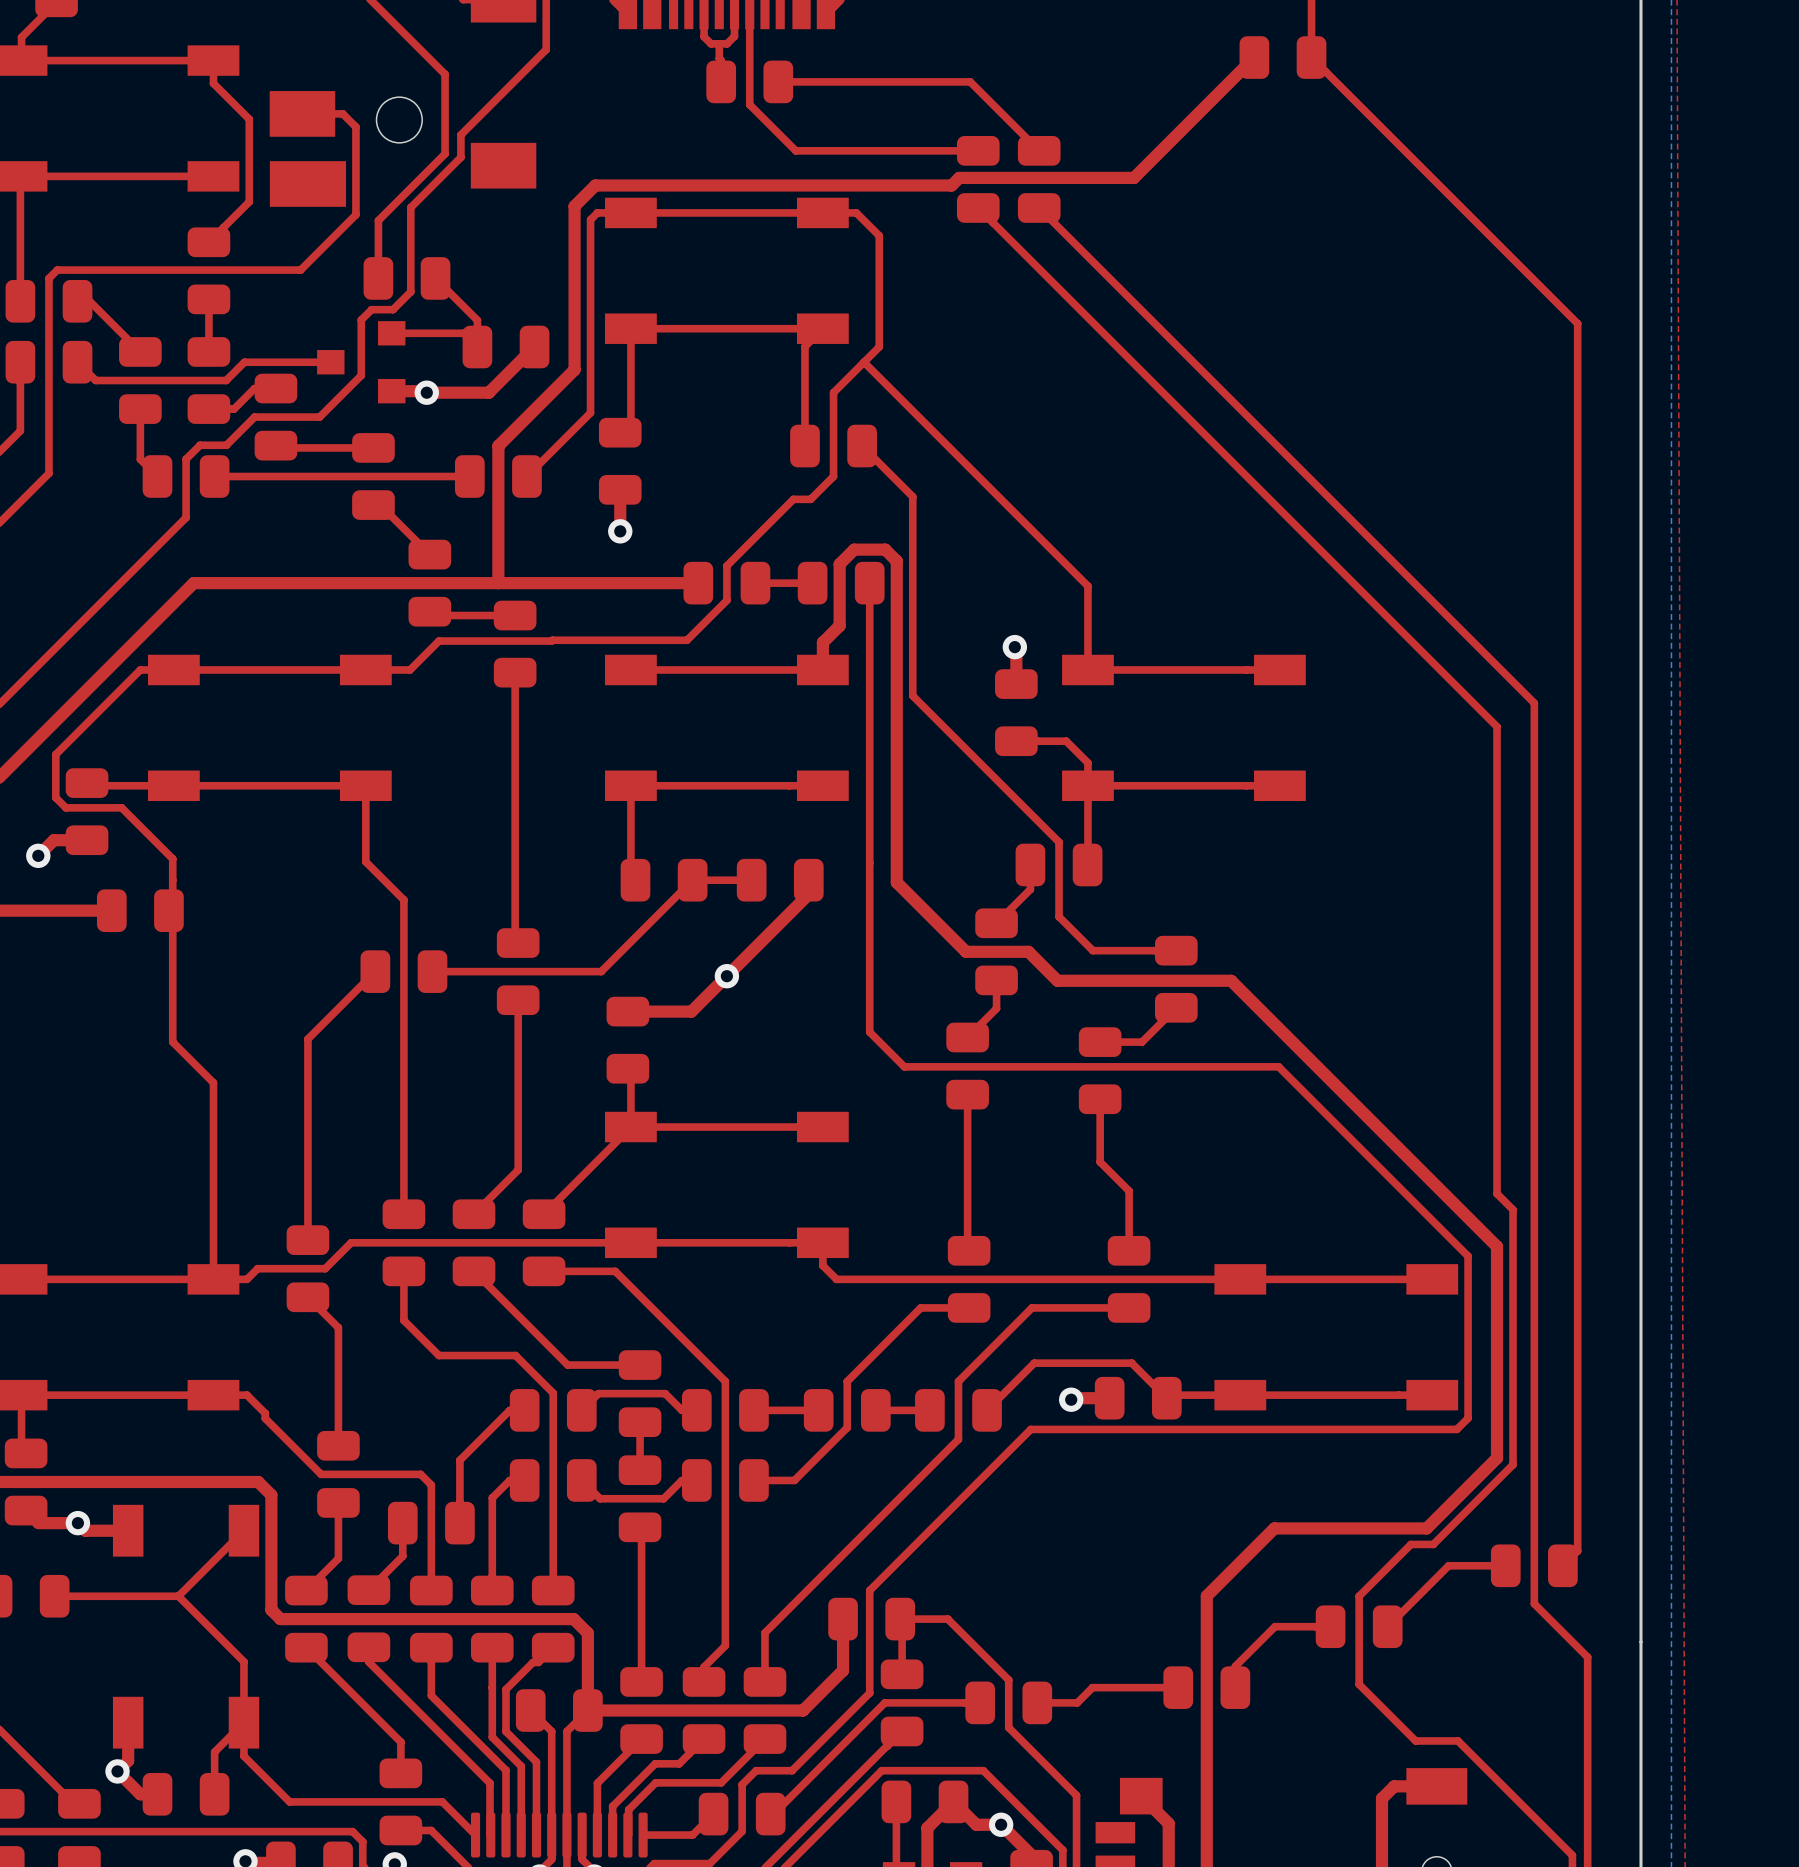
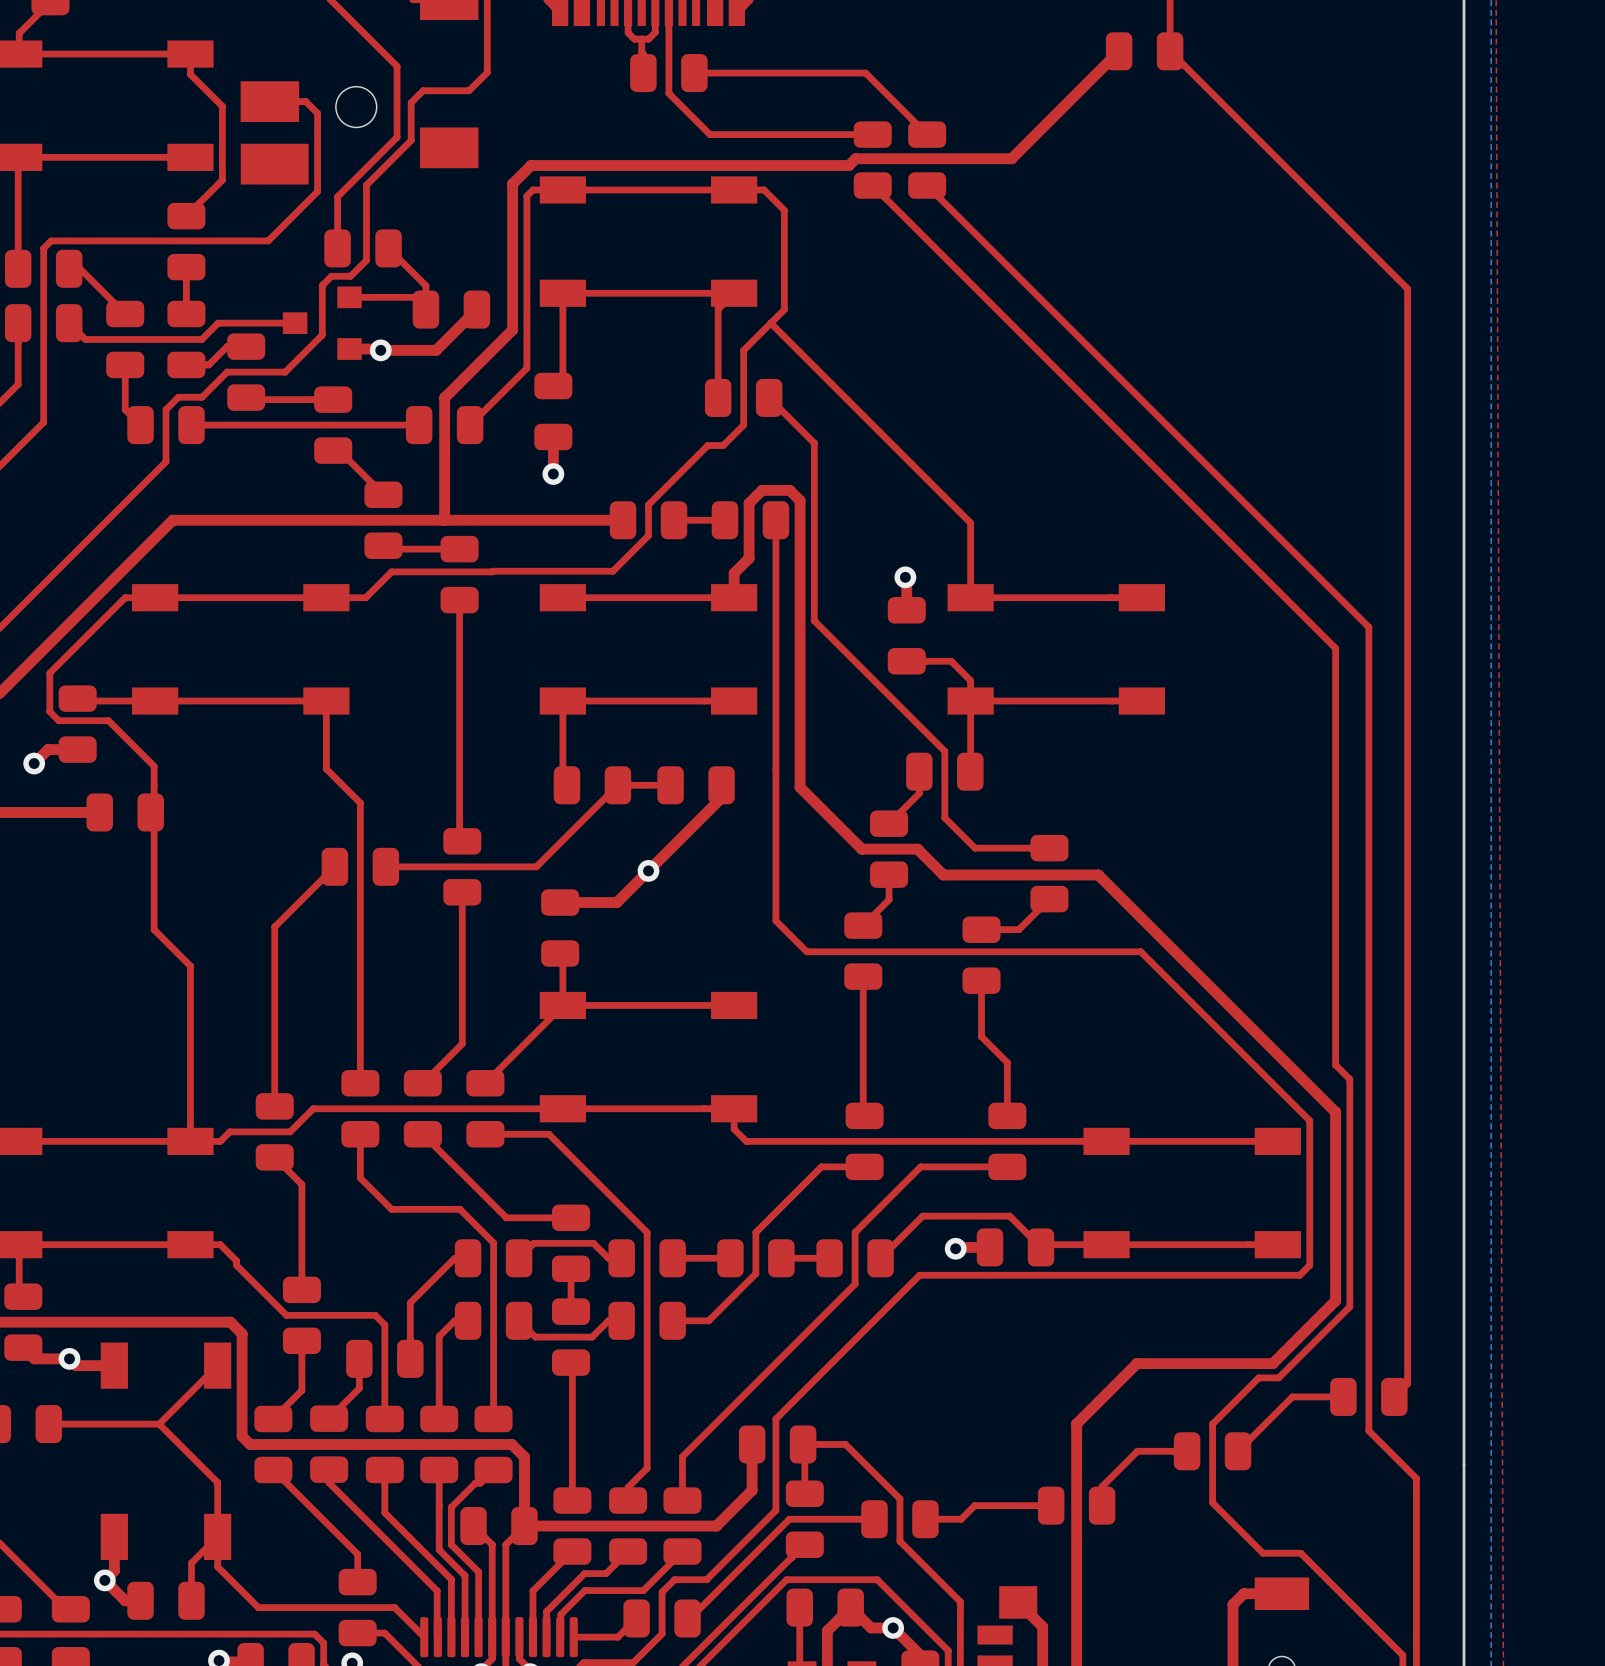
top track: (546, 49) (460, 134) -> (487, 44) (487, 72) (469, 90) (423, 90) (411, 102) (411, 120)

